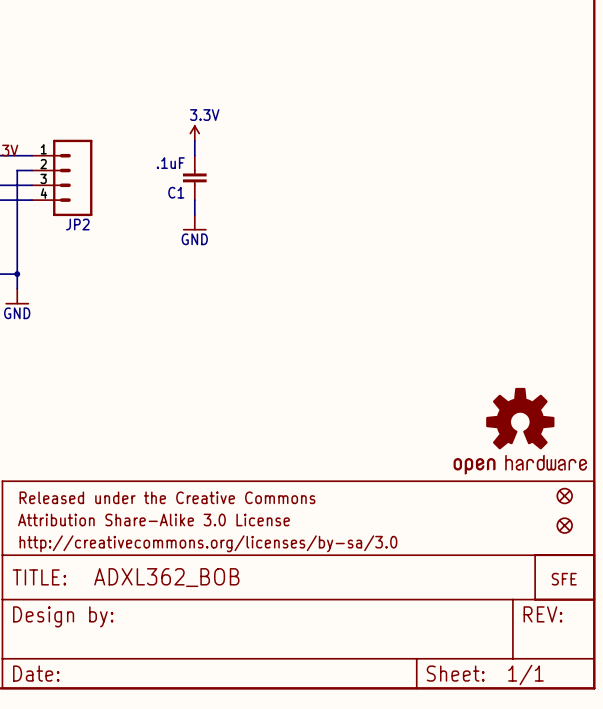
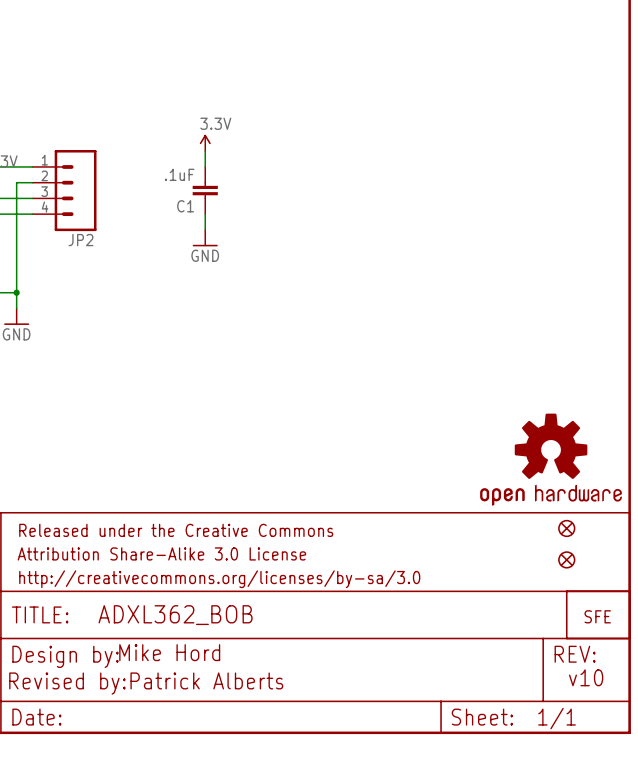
part: none -> (566, 528)
part: (564, 496) -> none
part: none -> (566, 559)
part: (564, 525) -> none
text: none -> Mike Hord (169, 652)
text: none -> v10 (586, 677)
text: none -> Revised by:Patrick Alberts (146, 683)

